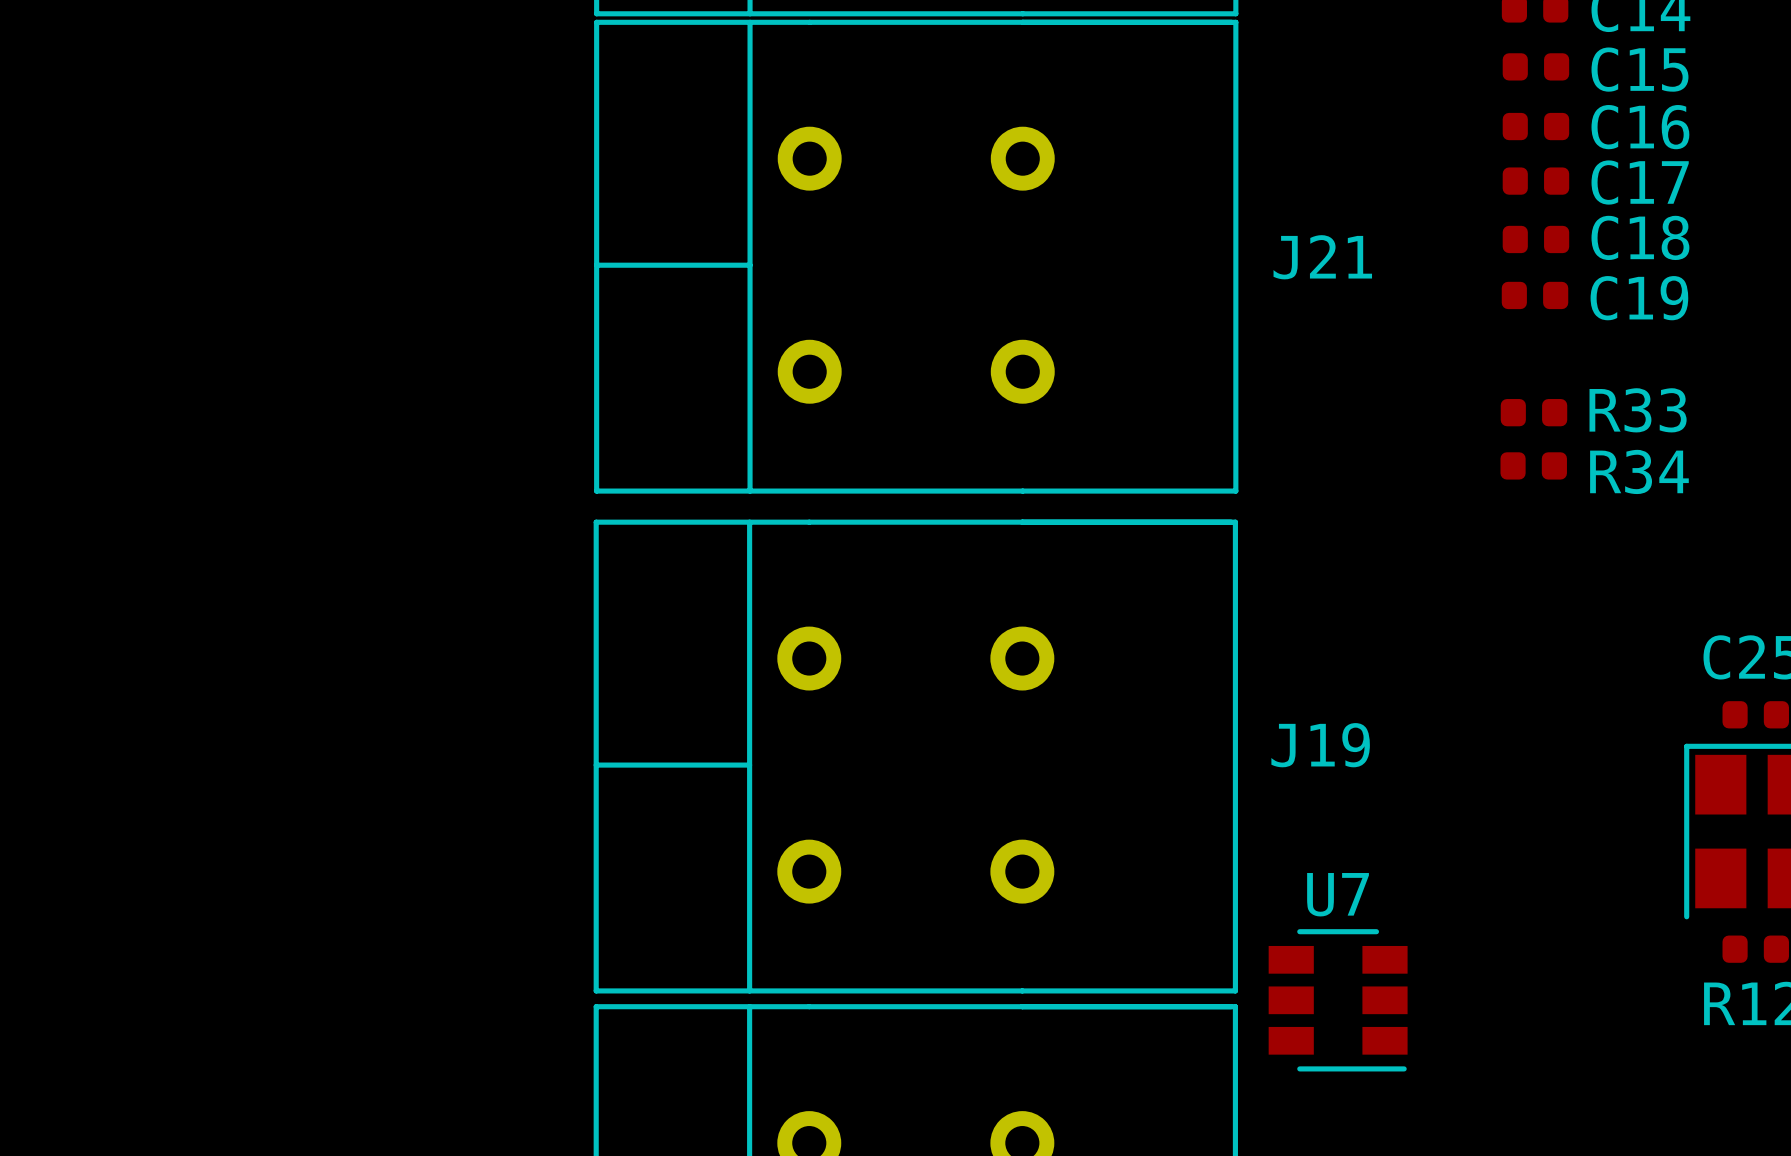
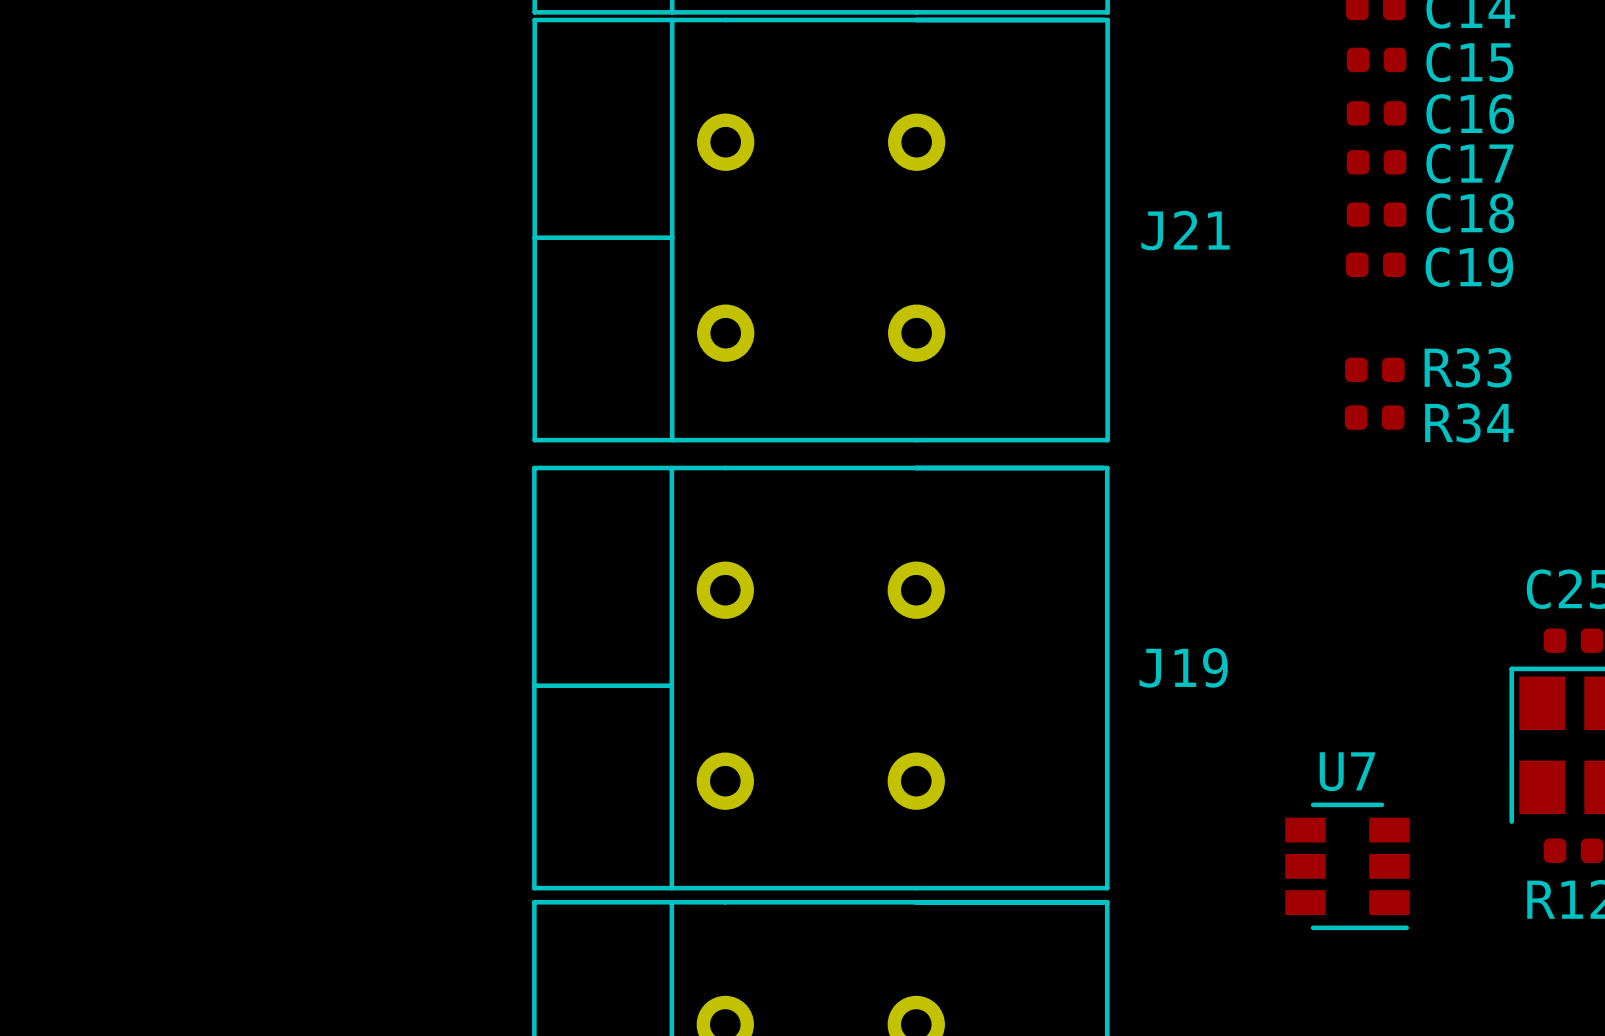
U7 position: (1338, 1000) -> (1347, 866)

